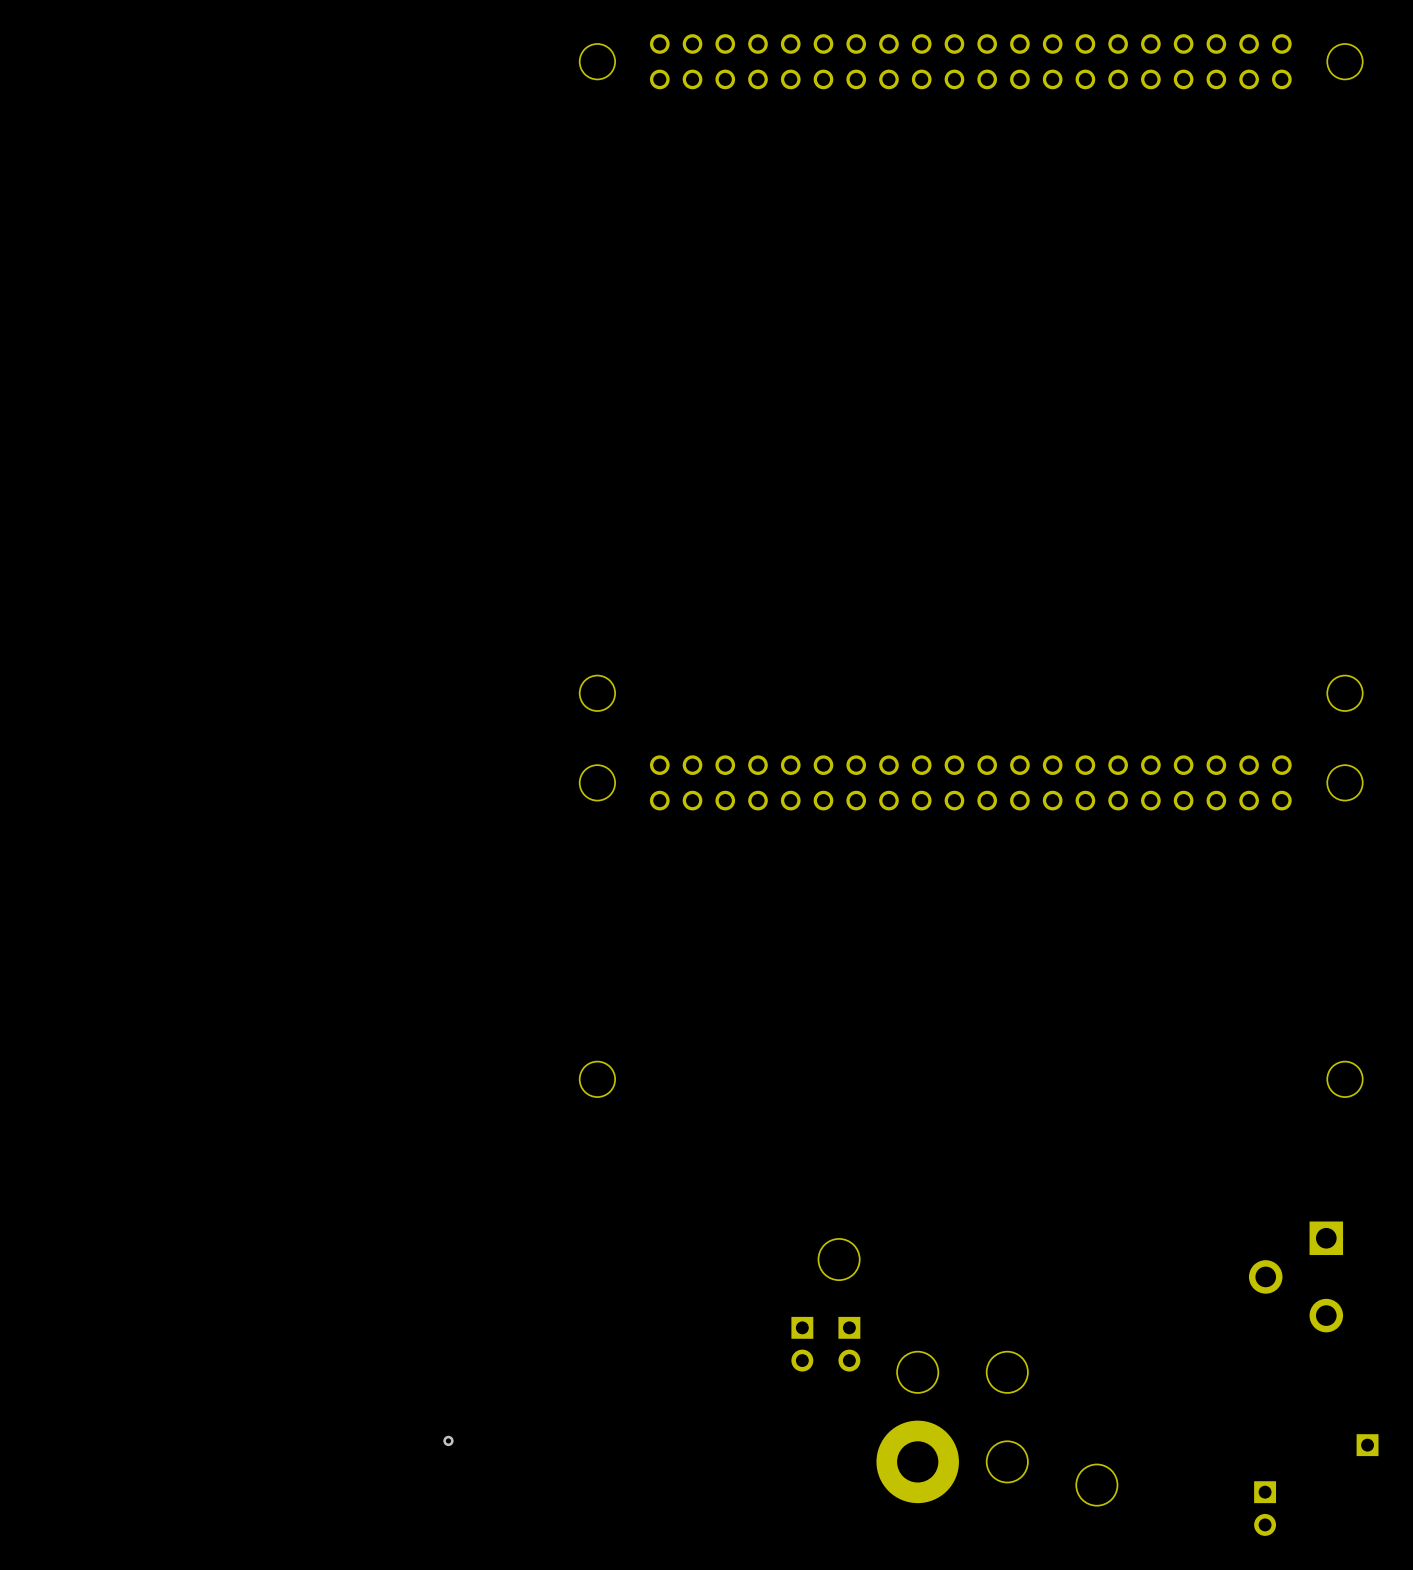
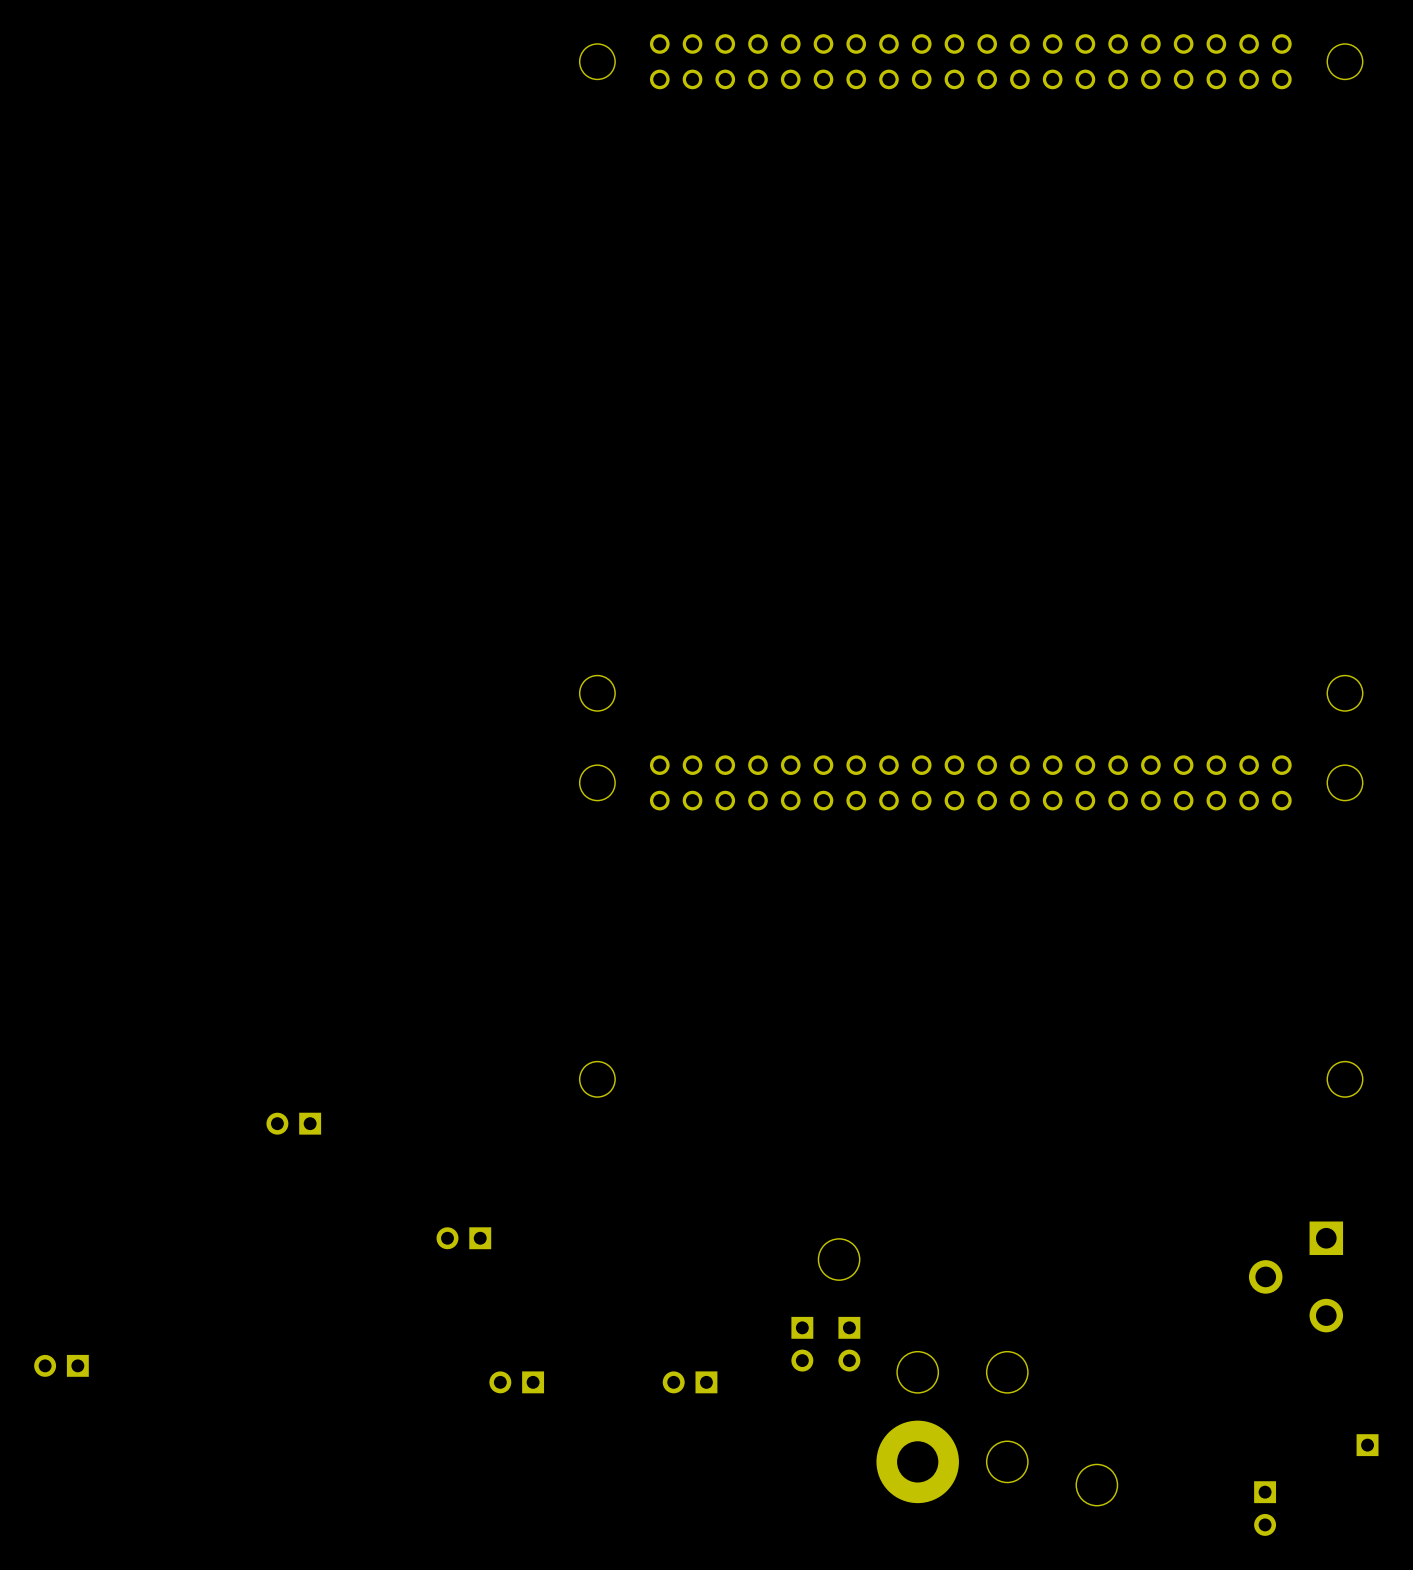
part: none -> (293, 1123)
part: none -> (463, 1238)
part: none -> (61, 1365)
part: none -> (516, 1382)
part: none -> (690, 1382)
via: (448, 1440) -> none

